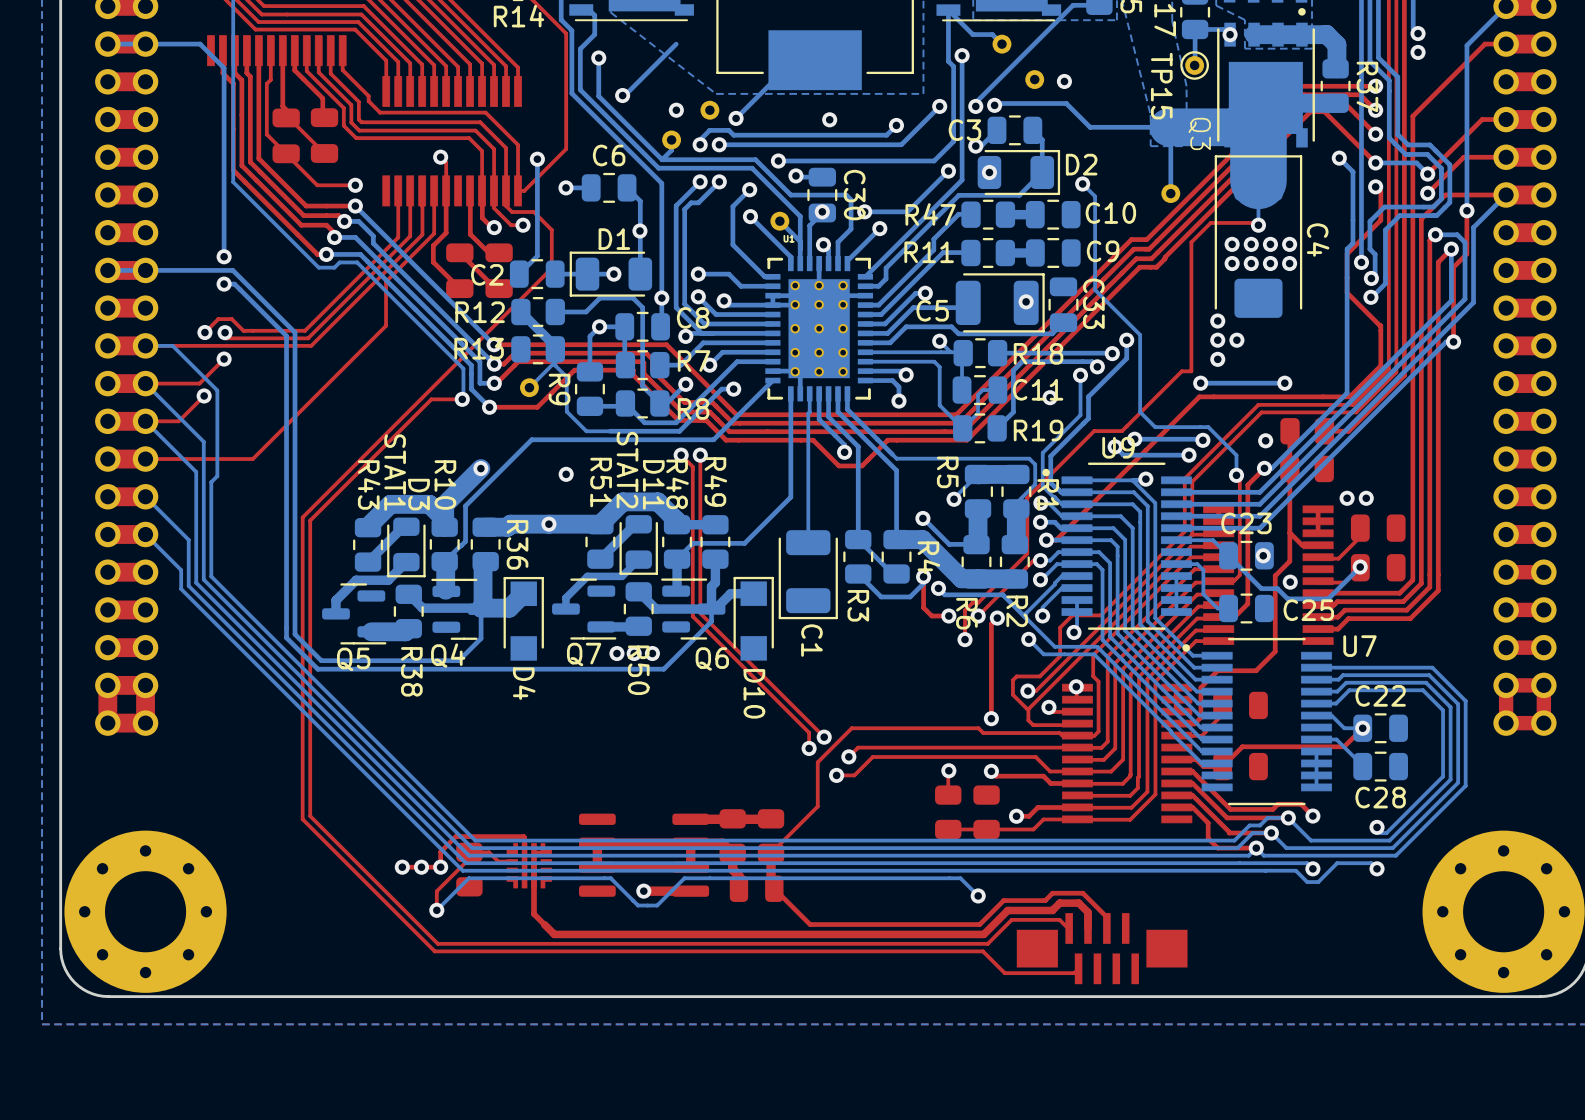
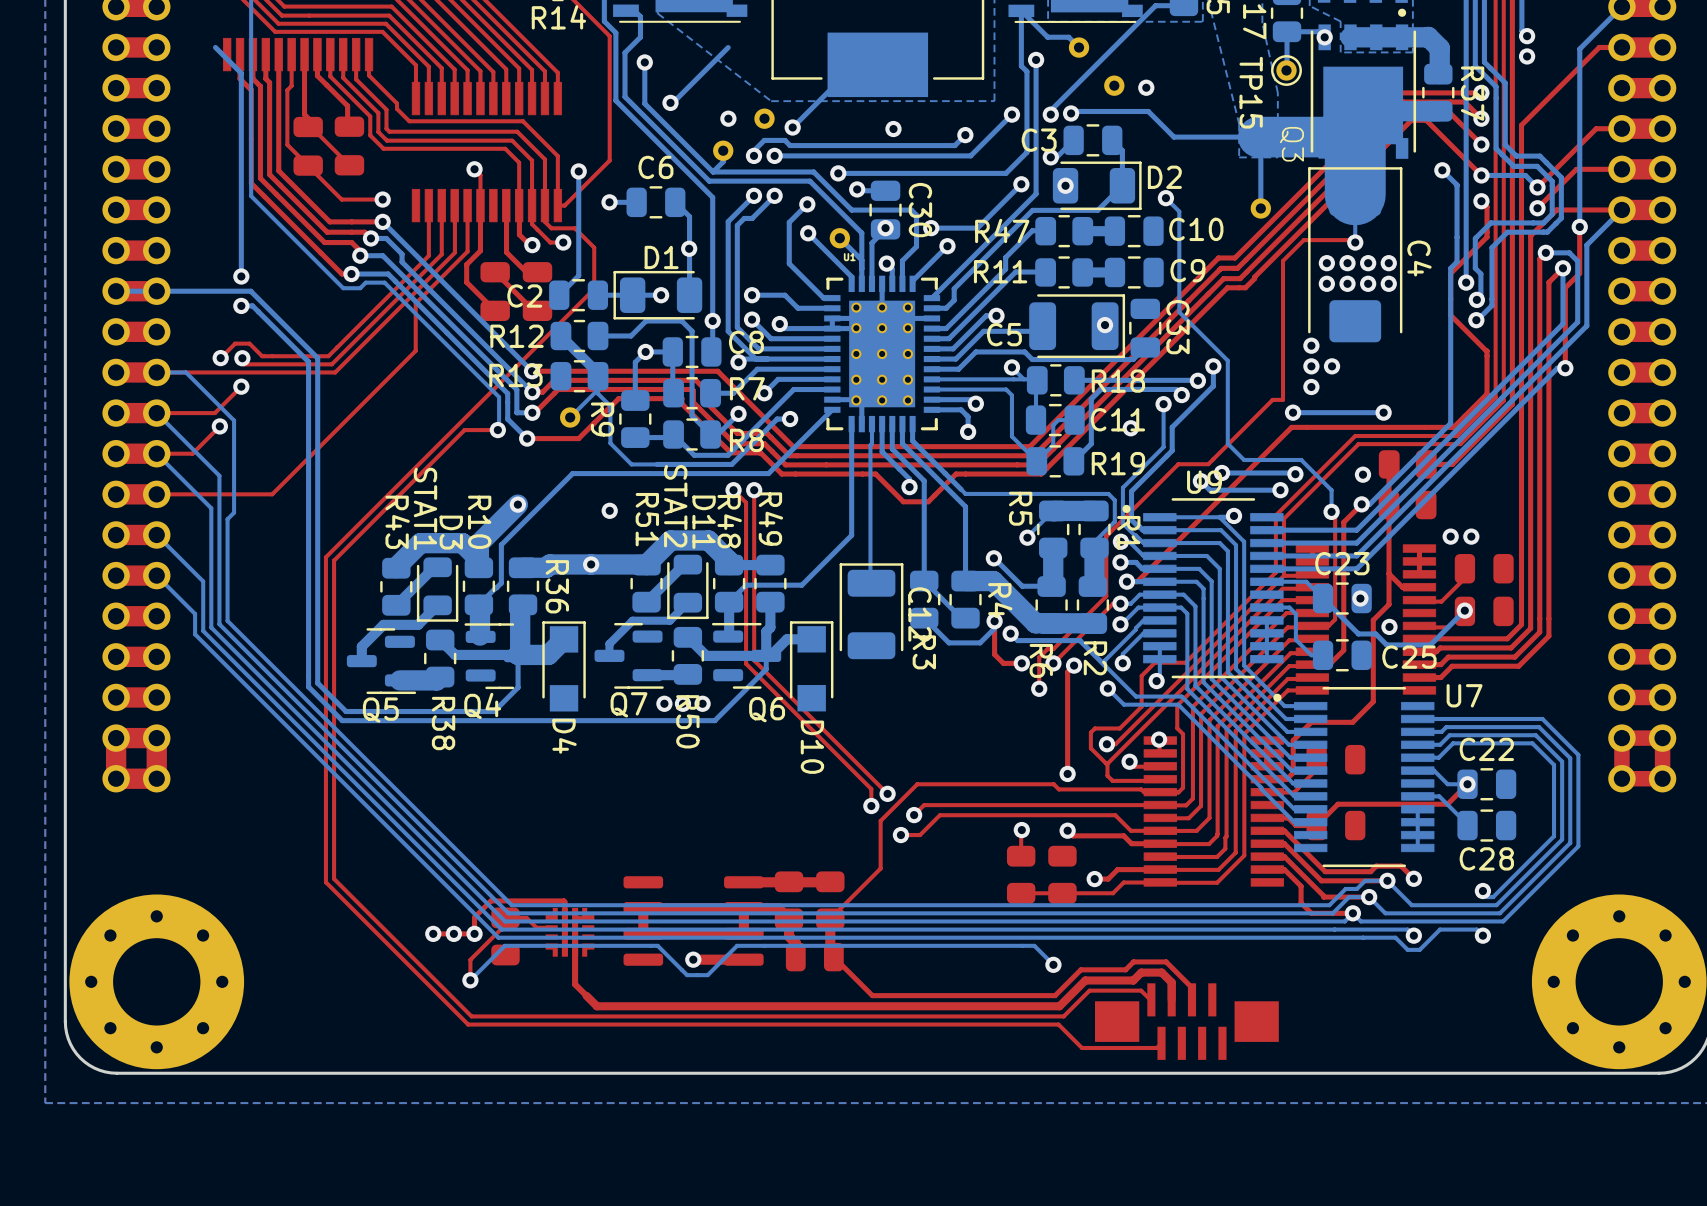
bottom track: (200, 44) (107, 44) -> none
C12: none -> (871, 611)
C1: (808, 574) -> none

